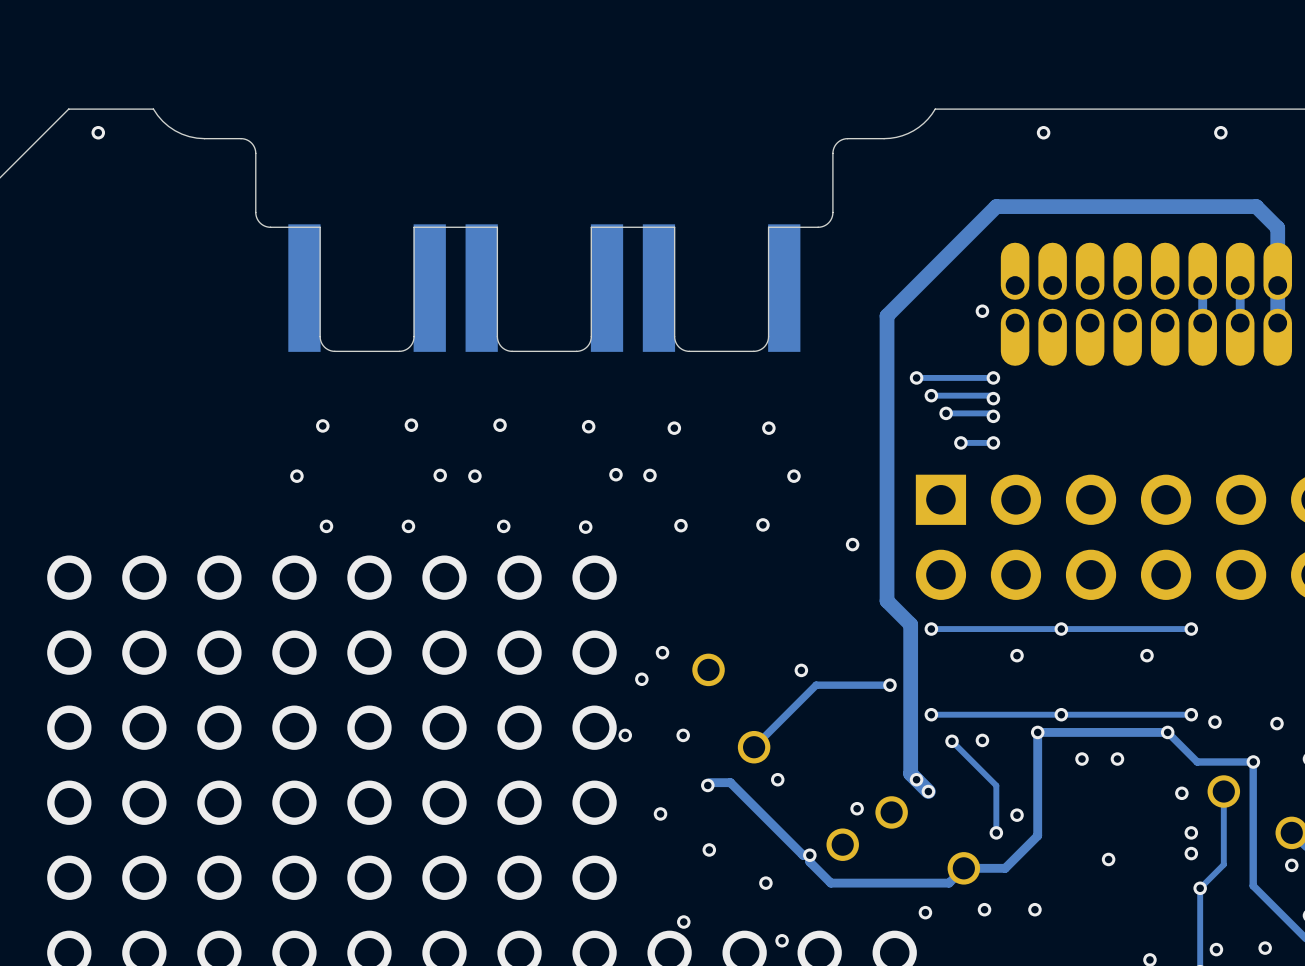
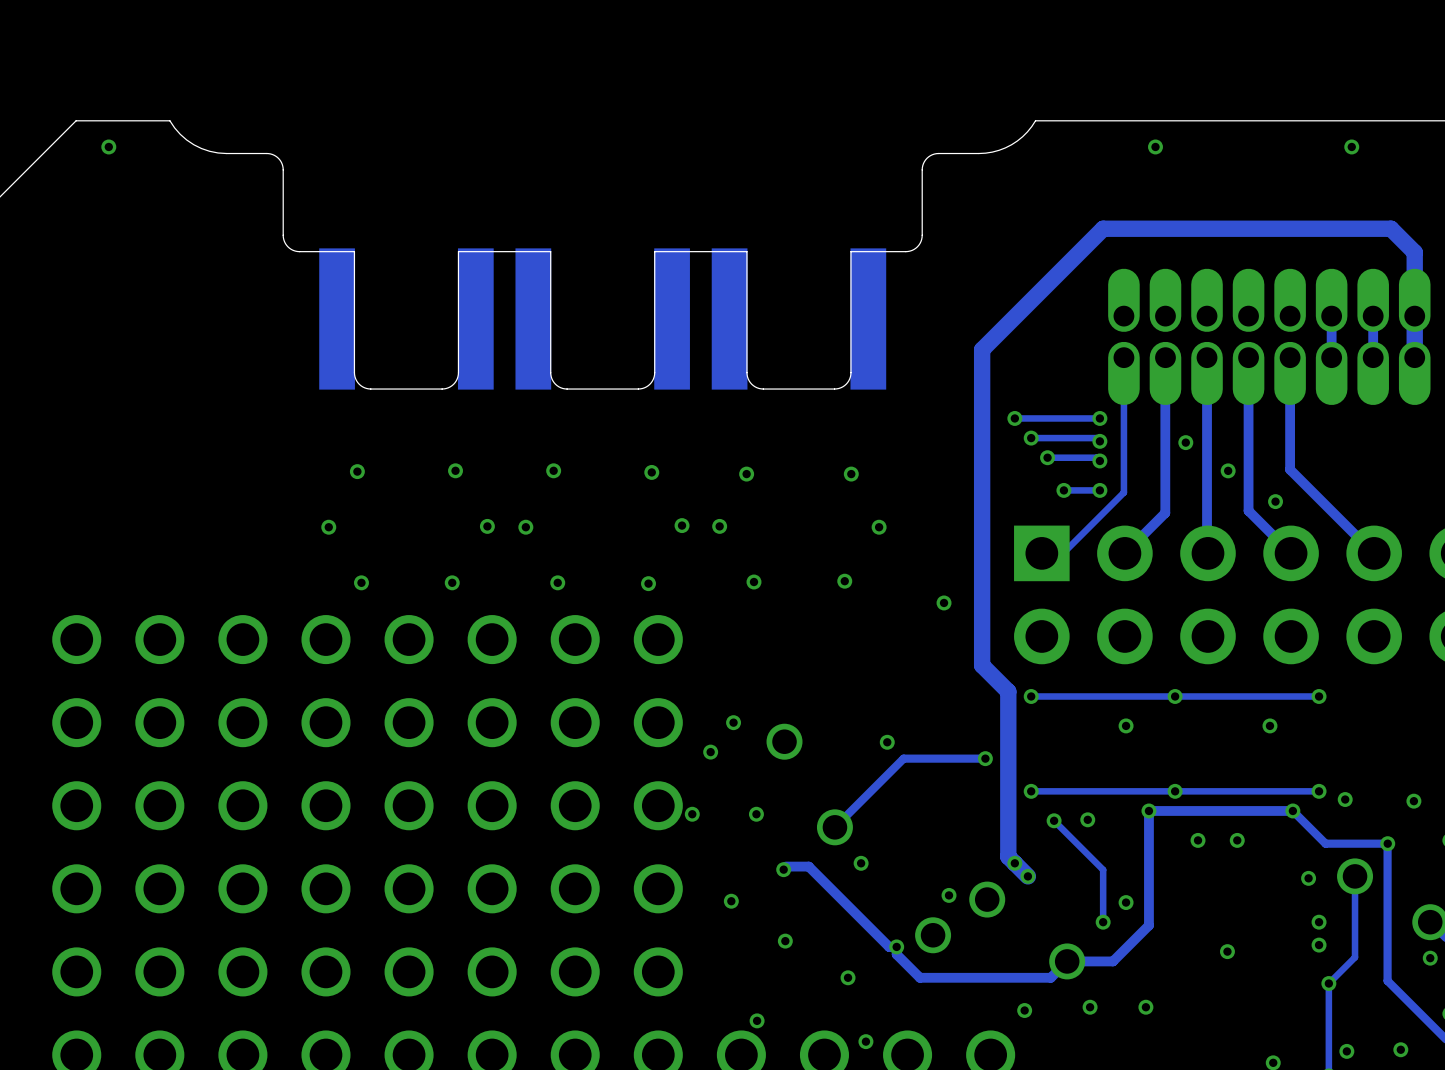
via: (982, 311) -> none
track: none -> (1123, 357) (1123, 492) (1063, 553) (1041, 553)
track: none -> (1165, 357) (1165, 512) (1123, 552)
track: none -> (1207, 357) (1208, 553)
track: none -> (1248, 357) (1248, 510) (1291, 553)
track: none -> (1290, 357) (1290, 469) (1373, 553)
via: none -> (1185, 442)
via: none -> (1228, 470)
via: none -> (1275, 501)

